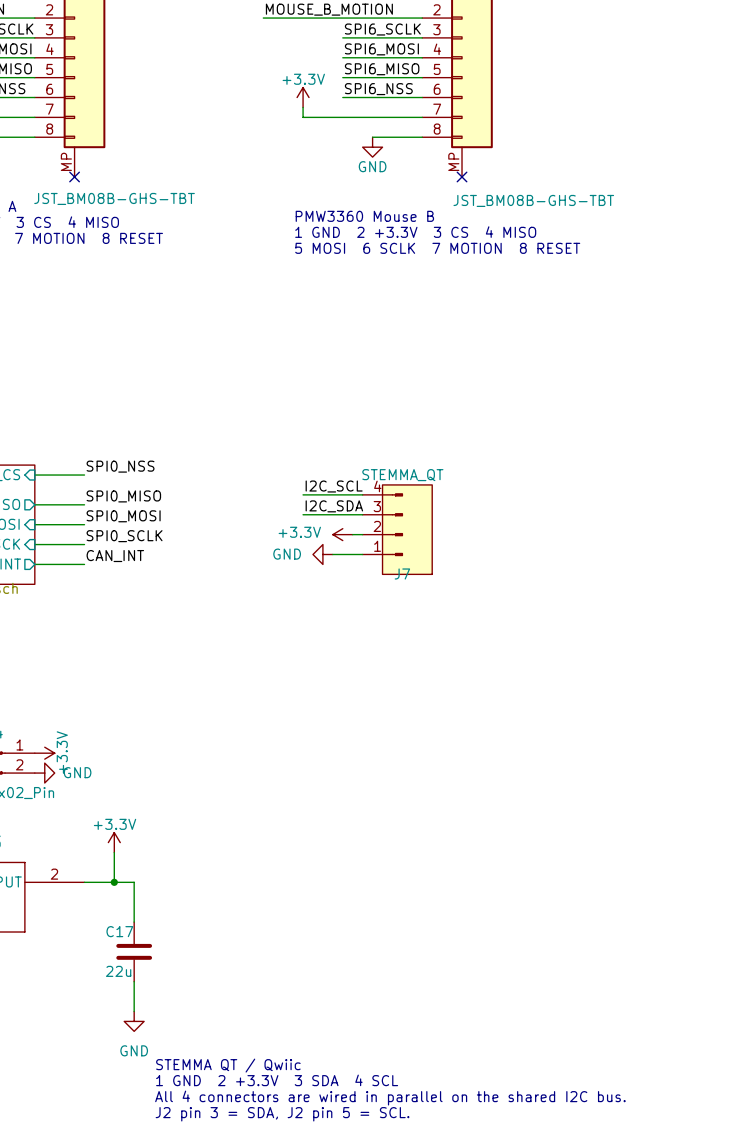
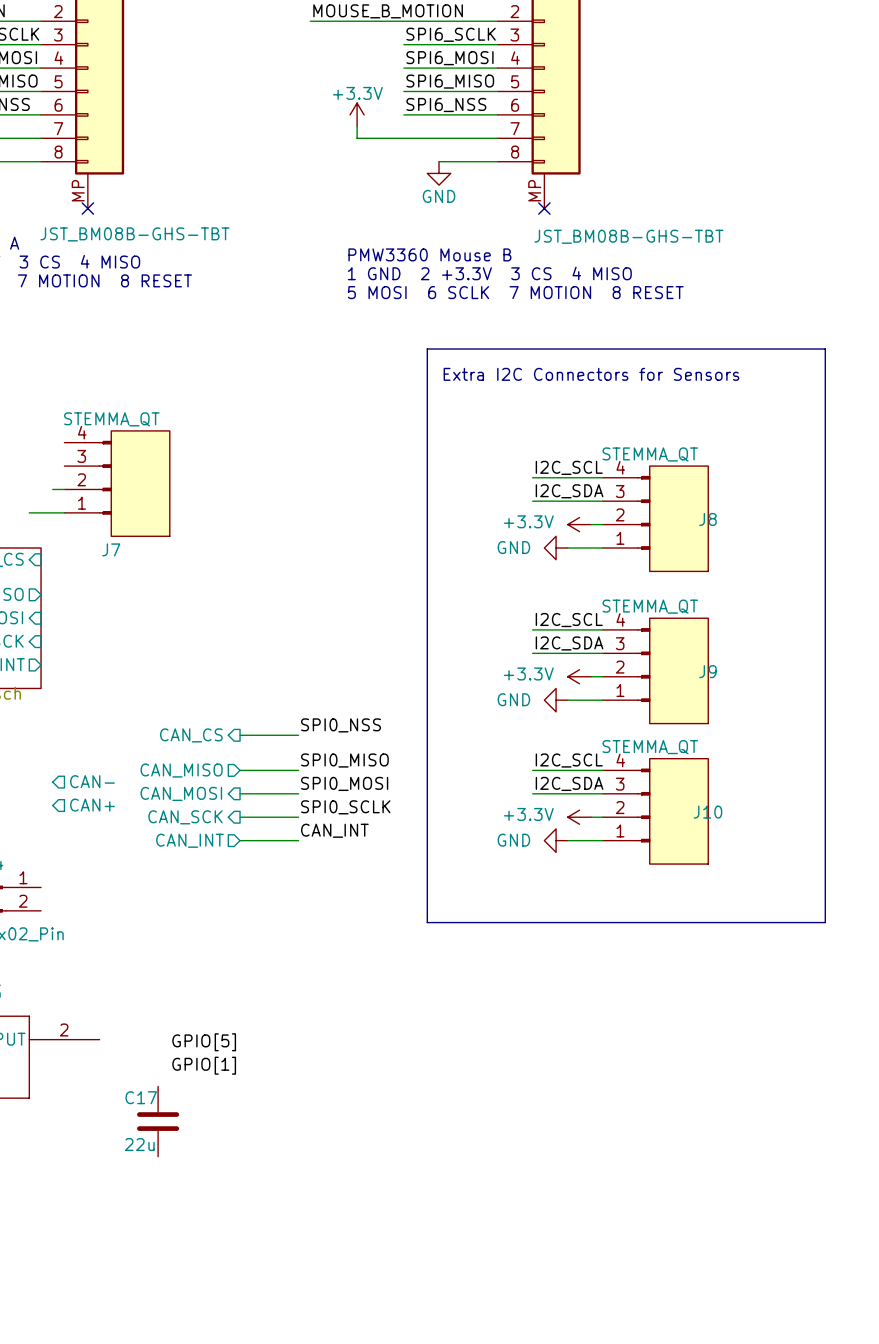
line: none -> (427, 349) (825, 349) (825, 922) (427, 922) (427, 349)
text: none -> Extra I2C Connectors for Sensors (591, 374)
label: none -> I2C_SCL (569, 467)
wire: none -> (532, 477) (602, 477)
wire: none -> (52, 489) (64, 489)
label: none -> I2C_SDA (569, 491)
wire: none -> (532, 501) (602, 501)
wire: none -> (29, 512) (64, 512)
J8: none -> STEMMA_QT (655, 518)
power symbol: none -> +3.3V (579, 524)
wire: none -> (591, 524) (602, 524)
power symbol: none -> GND (556, 548)
wire: none -> (567, 548) (602, 548)
label: SPI0_NSS (120, 466) -> none
wire: (34, 475) (84, 475) -> none
J7 symbol: [362, 484, 433, 575] -> [64, 430, 170, 537]
label: I2C_SCL (334, 486) -> none
wire: (303, 494) (362, 494) -> (532, 629) (602, 629)
label: SPI0_MISO (123, 496) -> none
wire: (34, 504) (84, 504) -> none
label: I2C_SDA (334, 506) -> none
wire: (303, 514) (362, 514) -> (532, 653) (602, 653)
label: SPI0_MOSI (123, 516) -> none
wire: (34, 524) (84, 524) -> none
label: none -> I2C_SCL (569, 620)
power symbol: +3.3V (342, 534) -> none
wire: (352, 534) (362, 534) -> (591, 676) (602, 676)
label: SPI0_SCLK (124, 536) -> none
wire: (34, 544) (84, 544) -> none
label: none -> I2C_SDA (569, 643)
power symbol: GND (322, 554) -> none
wire: (332, 554) (362, 554) -> (567, 700) (602, 700)
label: CAN_INT (115, 556) -> none
wire: (34, 564) (84, 564) -> (240, 735) (298, 735)
J9: none -> STEMMA_QT (655, 670)
power symbol: none -> +3.3V (579, 676)
power symbol: none -> GND (556, 700)
label: none -> SPI0_NSS (341, 725)
sheet pin: none -> CAN_CS (191, 735)
label: none -> SPI0_MISO (344, 760)
label: none -> I2C_SCL (569, 760)
sheet pin: none -> CAN_MISO (181, 770)
wire: none -> (240, 770) (298, 770)
wire: none -> (532, 770) (602, 770)
sheet pin: none -> CAN- (92, 781)
label: none -> SPI0_MOSI (344, 783)
label: none -> I2C_SDA (569, 783)
sheet pin: none -> CAN_MOSI (181, 793)
wire: none -> (240, 793) (298, 793)
wire: none -> (532, 793) (602, 793)
sheet pin: none -> CAN+ (92, 805)
label: none -> SPI0_SCLK (345, 807)
J10: none -> STEMMA_QT (655, 811)
sheet pin: none -> CAN_SCK (185, 817)
wire: none -> (240, 817) (298, 817)
power symbol: none -> +3.3V (579, 817)
wire: none -> (591, 817) (602, 817)
label: none -> CAN_INT (334, 830)
sheet pin: none -> CAN_INT (189, 840)
wire: none -> (240, 840) (298, 840)
power symbol: none -> GND (556, 840)
wire: none -> (567, 840) (602, 840)
power symbol: +3.3V (44, 753) -> none
power symbol: GND (44, 773) -> none
power symbol: +3.3V (114, 842) -> none
wire: (114, 852) (114, 882) -> none
wire: (84, 882) (134, 882) (134, 922) -> none
junction: (114, 882) -> none
label: none -> GPIO[5] (204, 1042)
label: none -> GPIO[1] (204, 1065)
wire: (134, 981) (134, 1011) -> none
power symbol: GND (134, 1021) -> none
text: STEMMA QT / Qwiic (228, 1065) -> none
text: 1 GND 2 +3.3V 3 SDA 4 SCL (277, 1080) -> none
text: All 4 connectors are wired in parallel on the shared I2C bus. (390, 1098) -> none
text: J2 pin 3 = SDA, J2 pin 5 = SCL. (282, 1114) -> none

